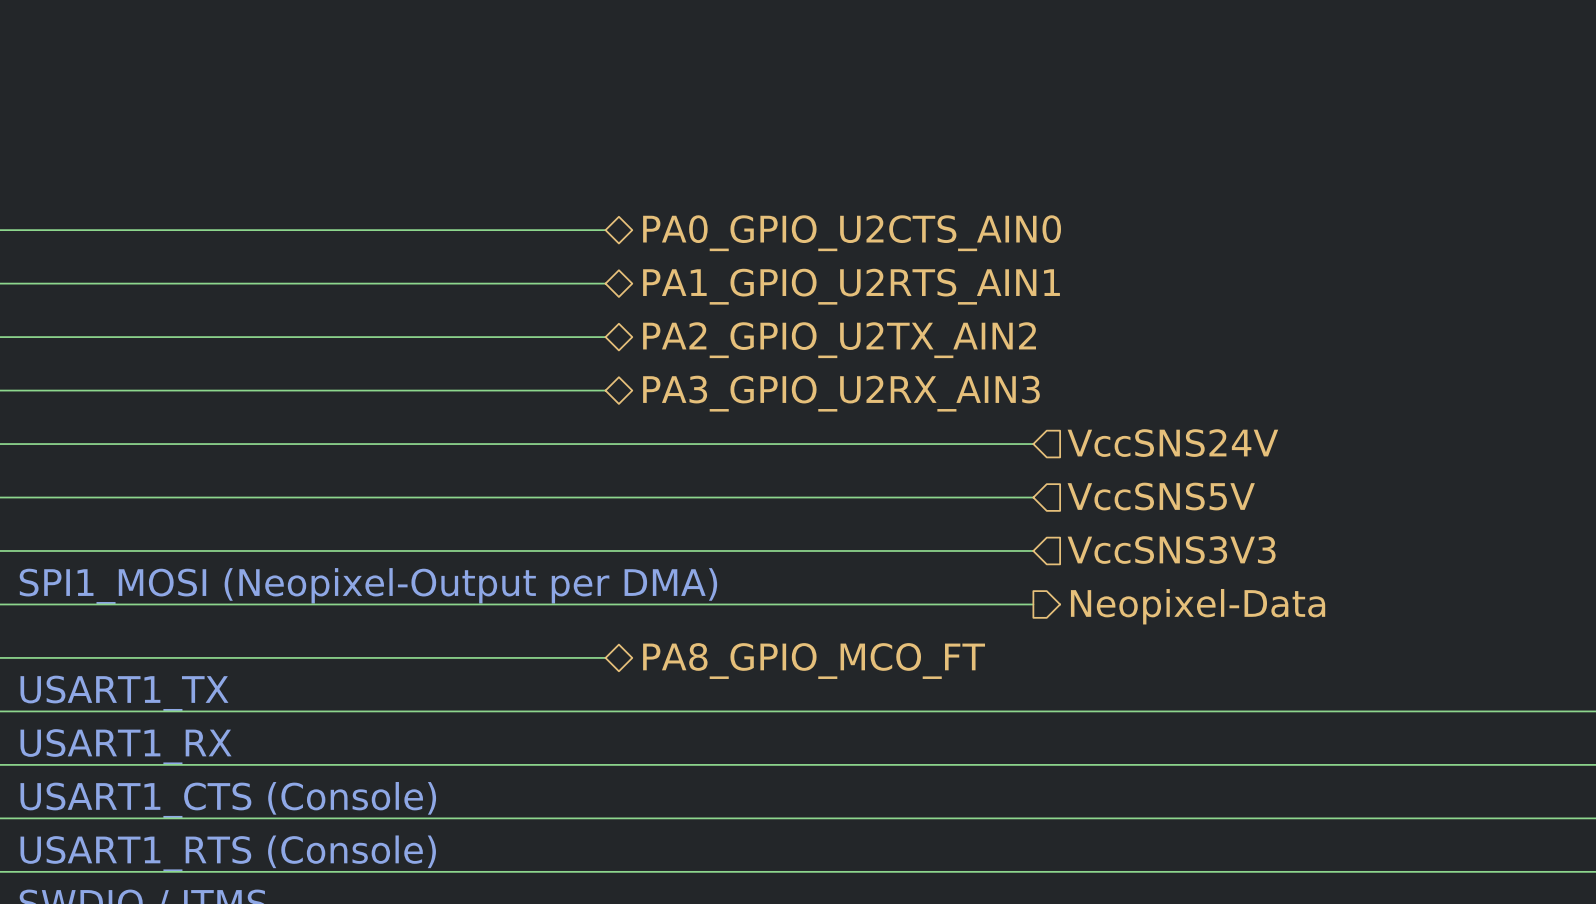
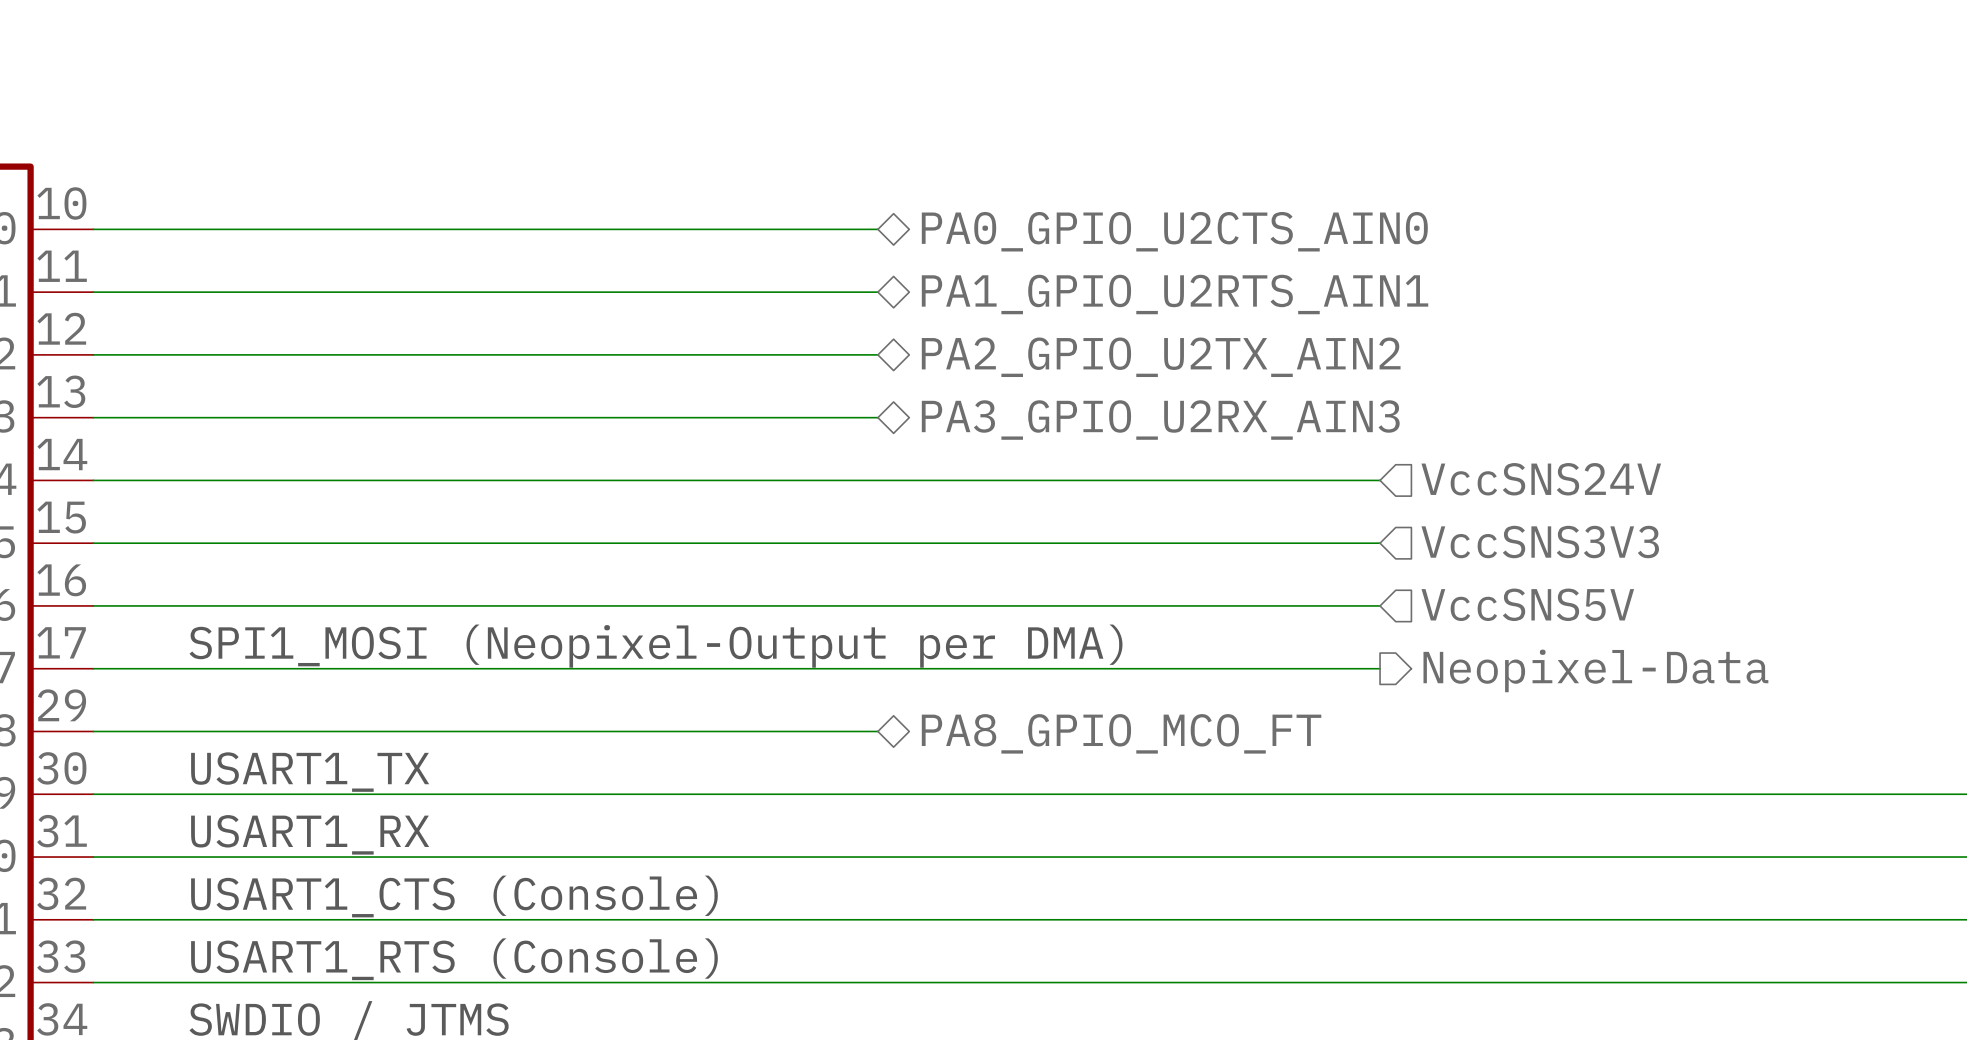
hierarchical label: VccSNS5V (1161, 496) -> VccSNS3V3 (1540, 542)
hierarchical label: VccSNS3V3 (1171, 550) -> VccSNS5V (1527, 604)

